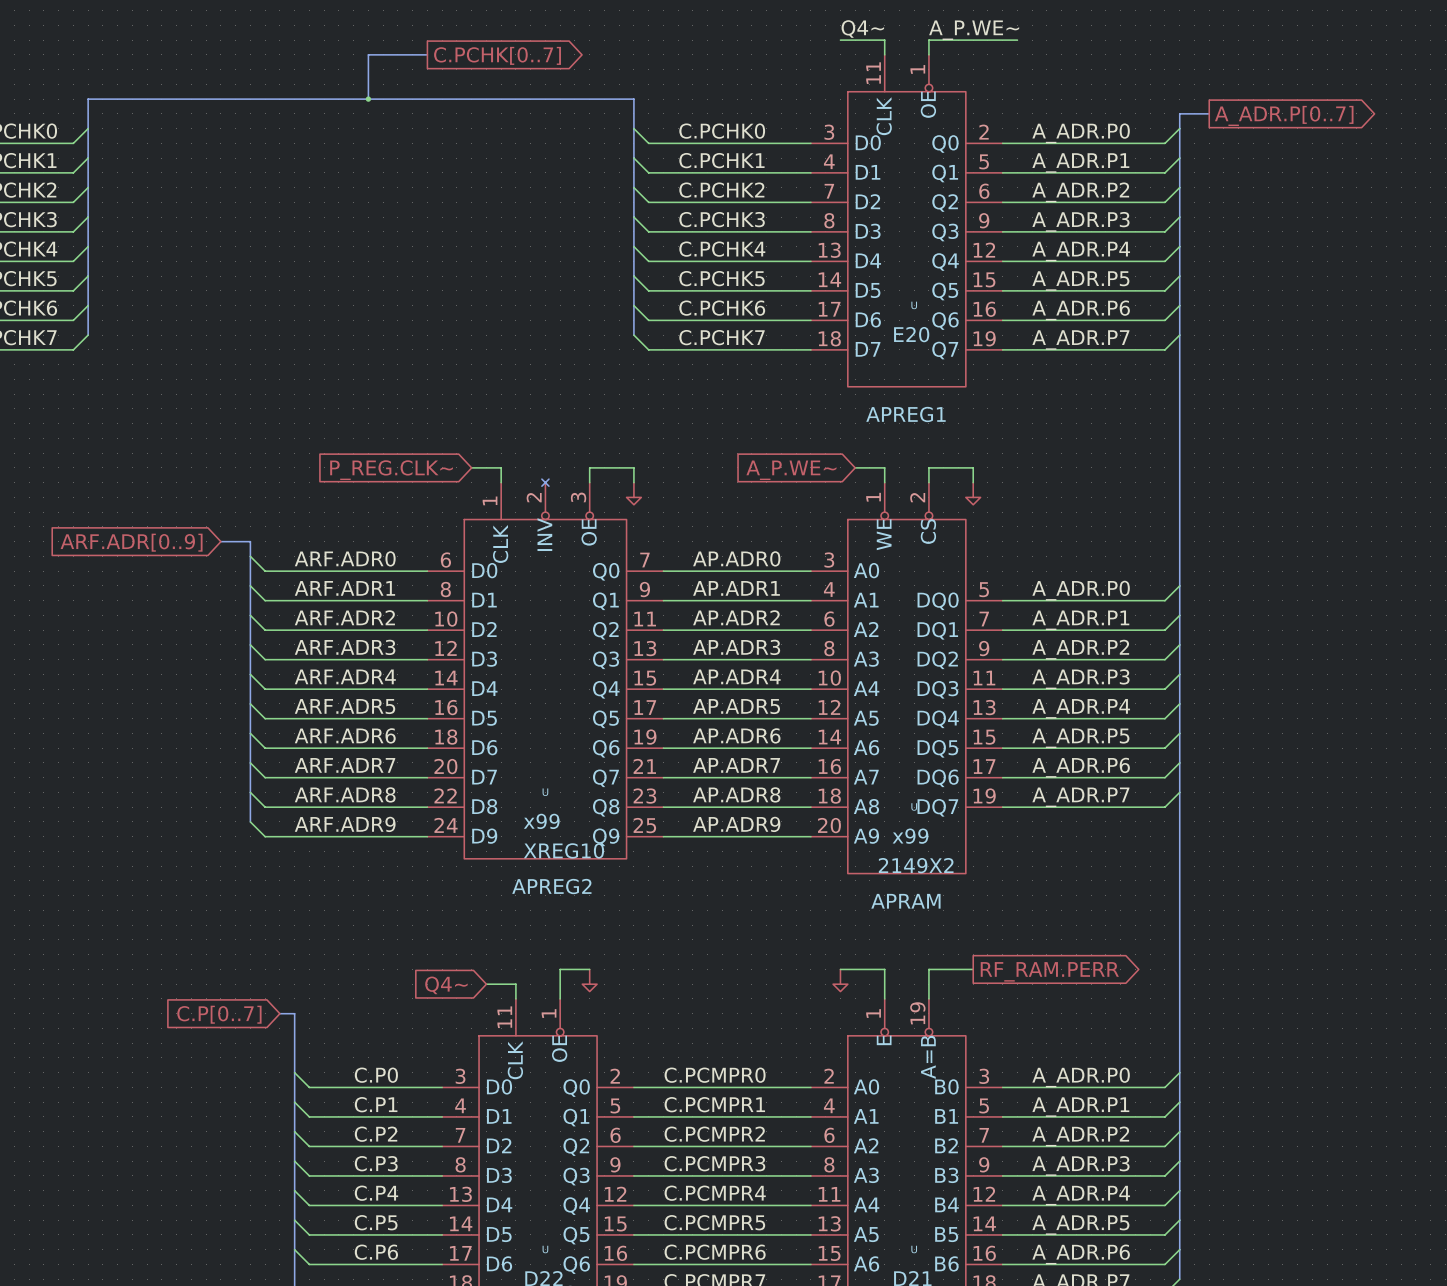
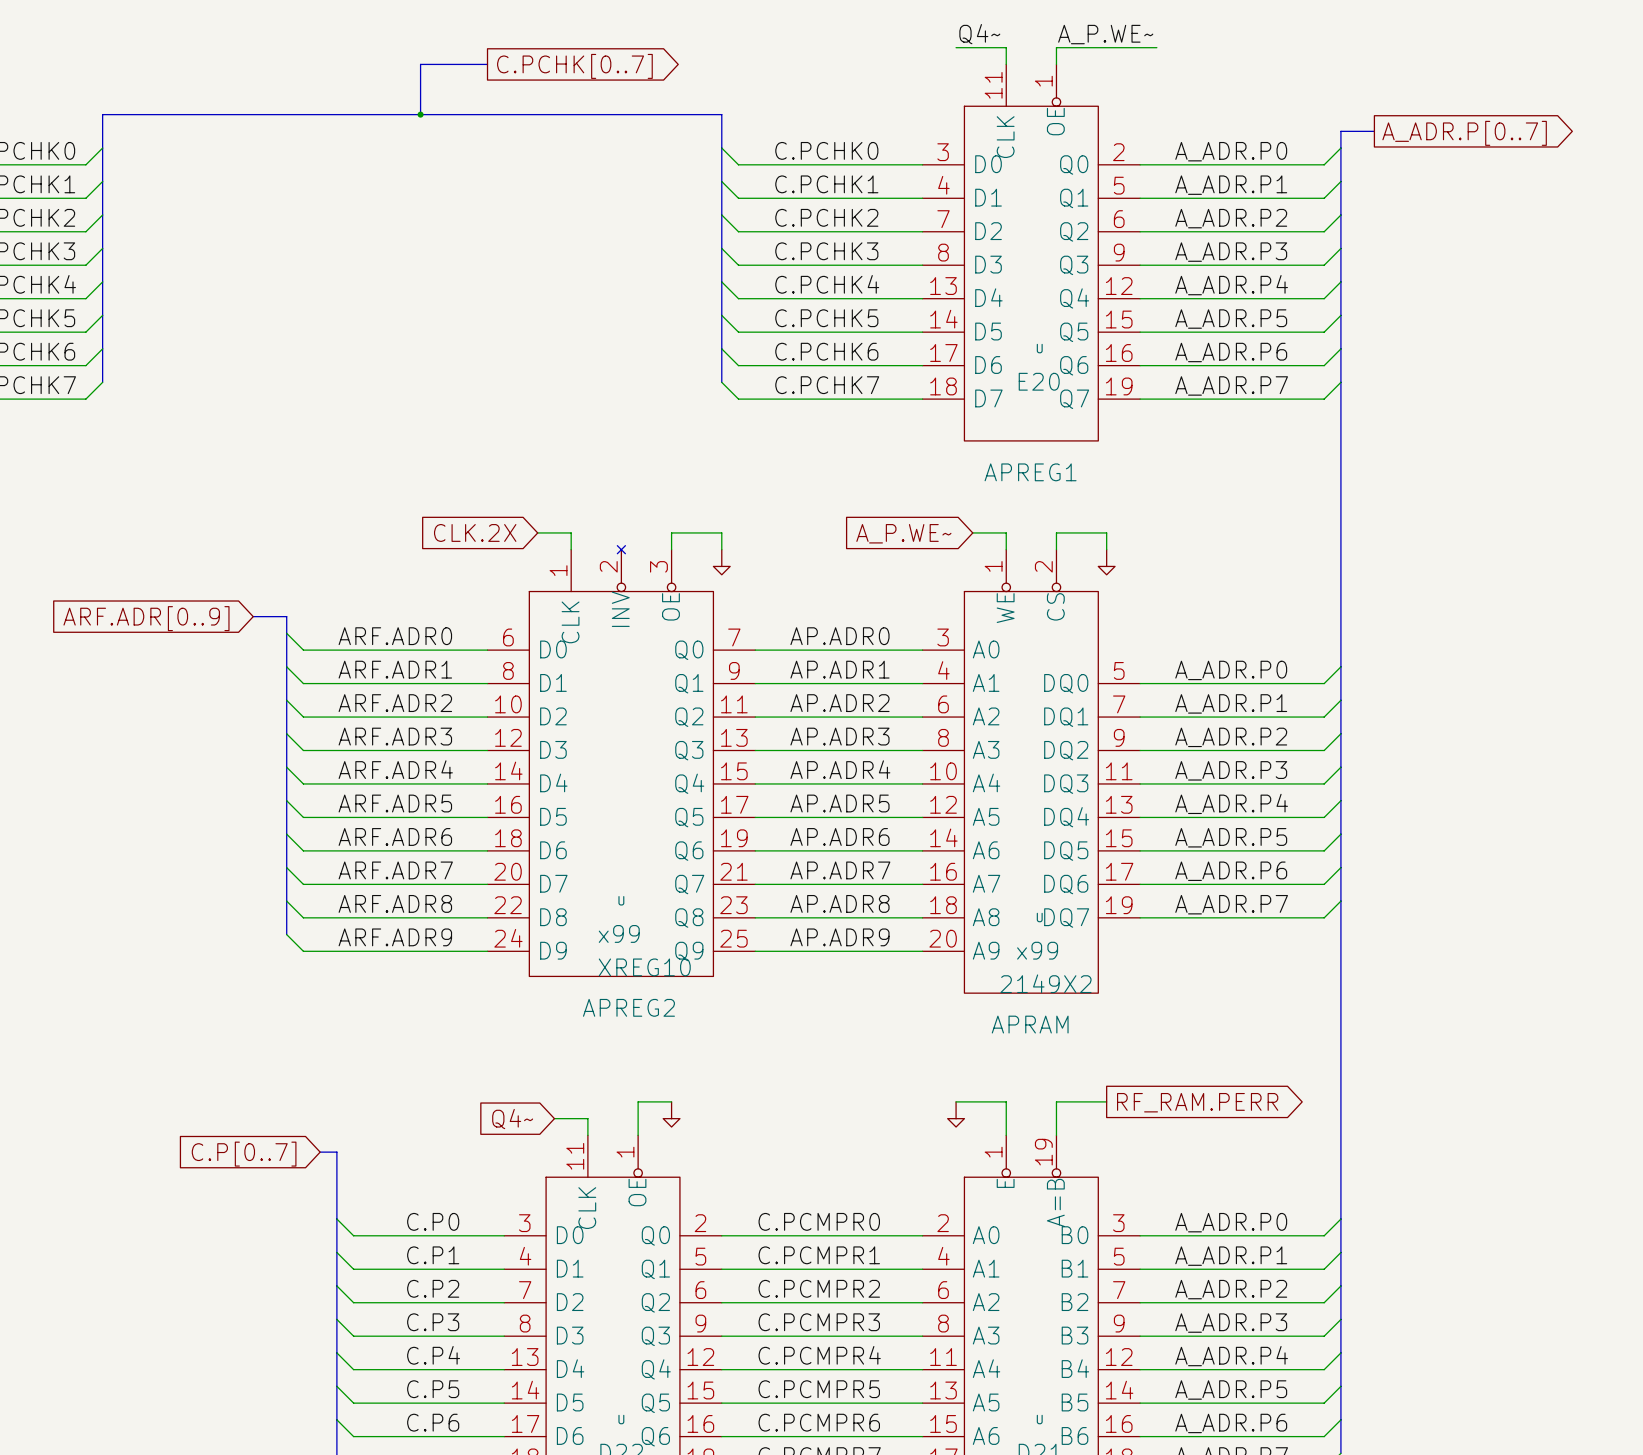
global label: P_REG.CLK~ (391, 470) -> CLK.2X (475, 532)

